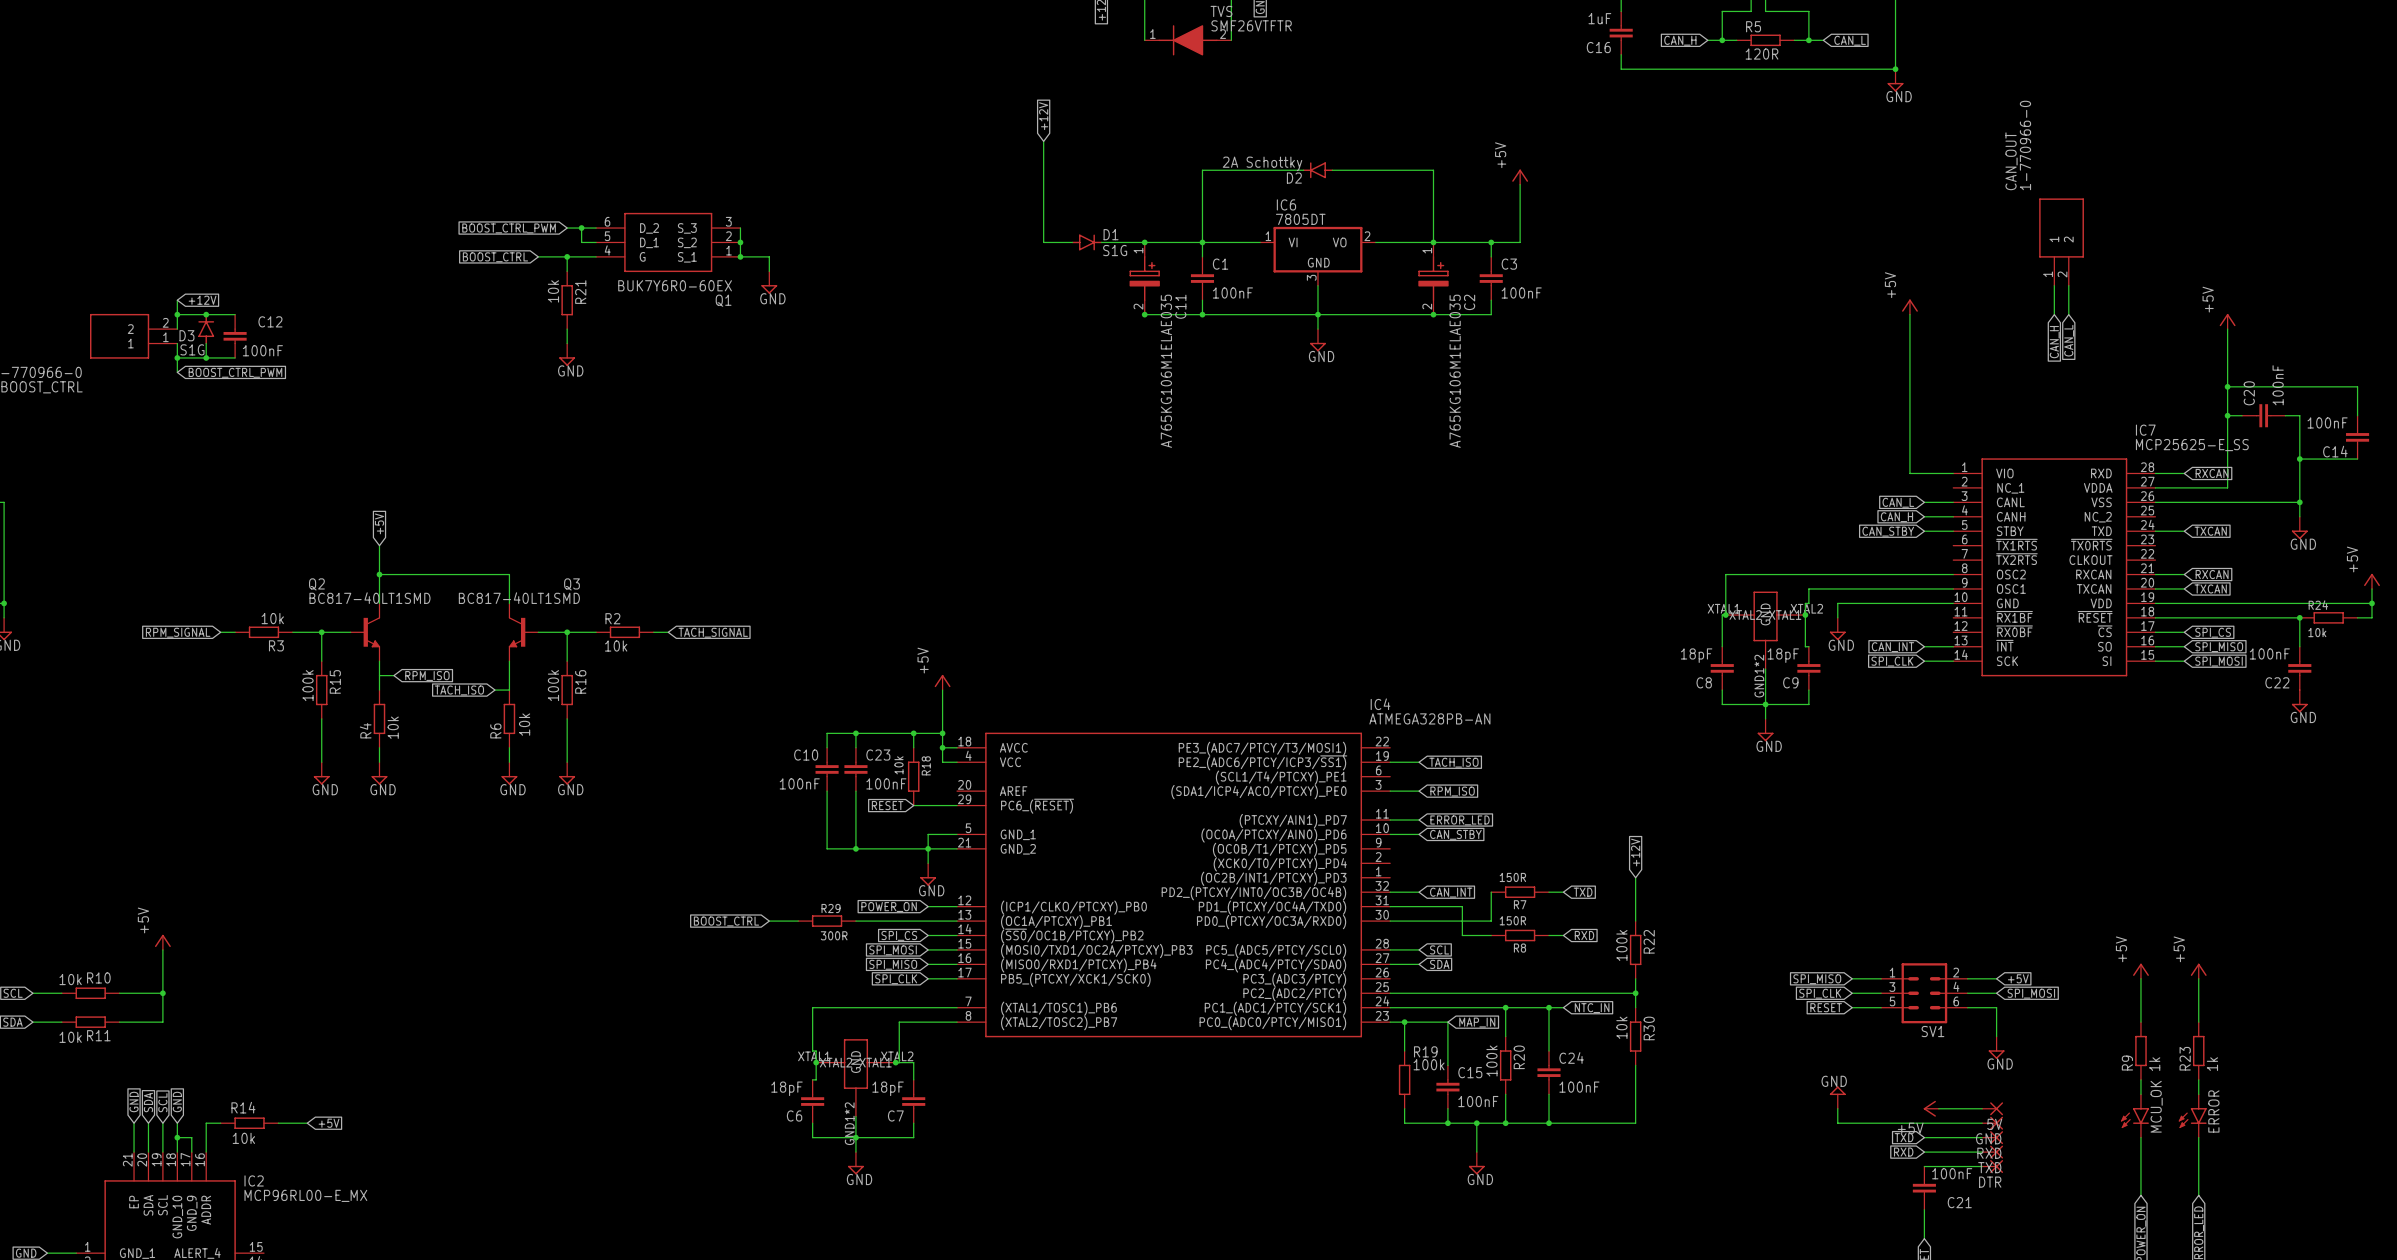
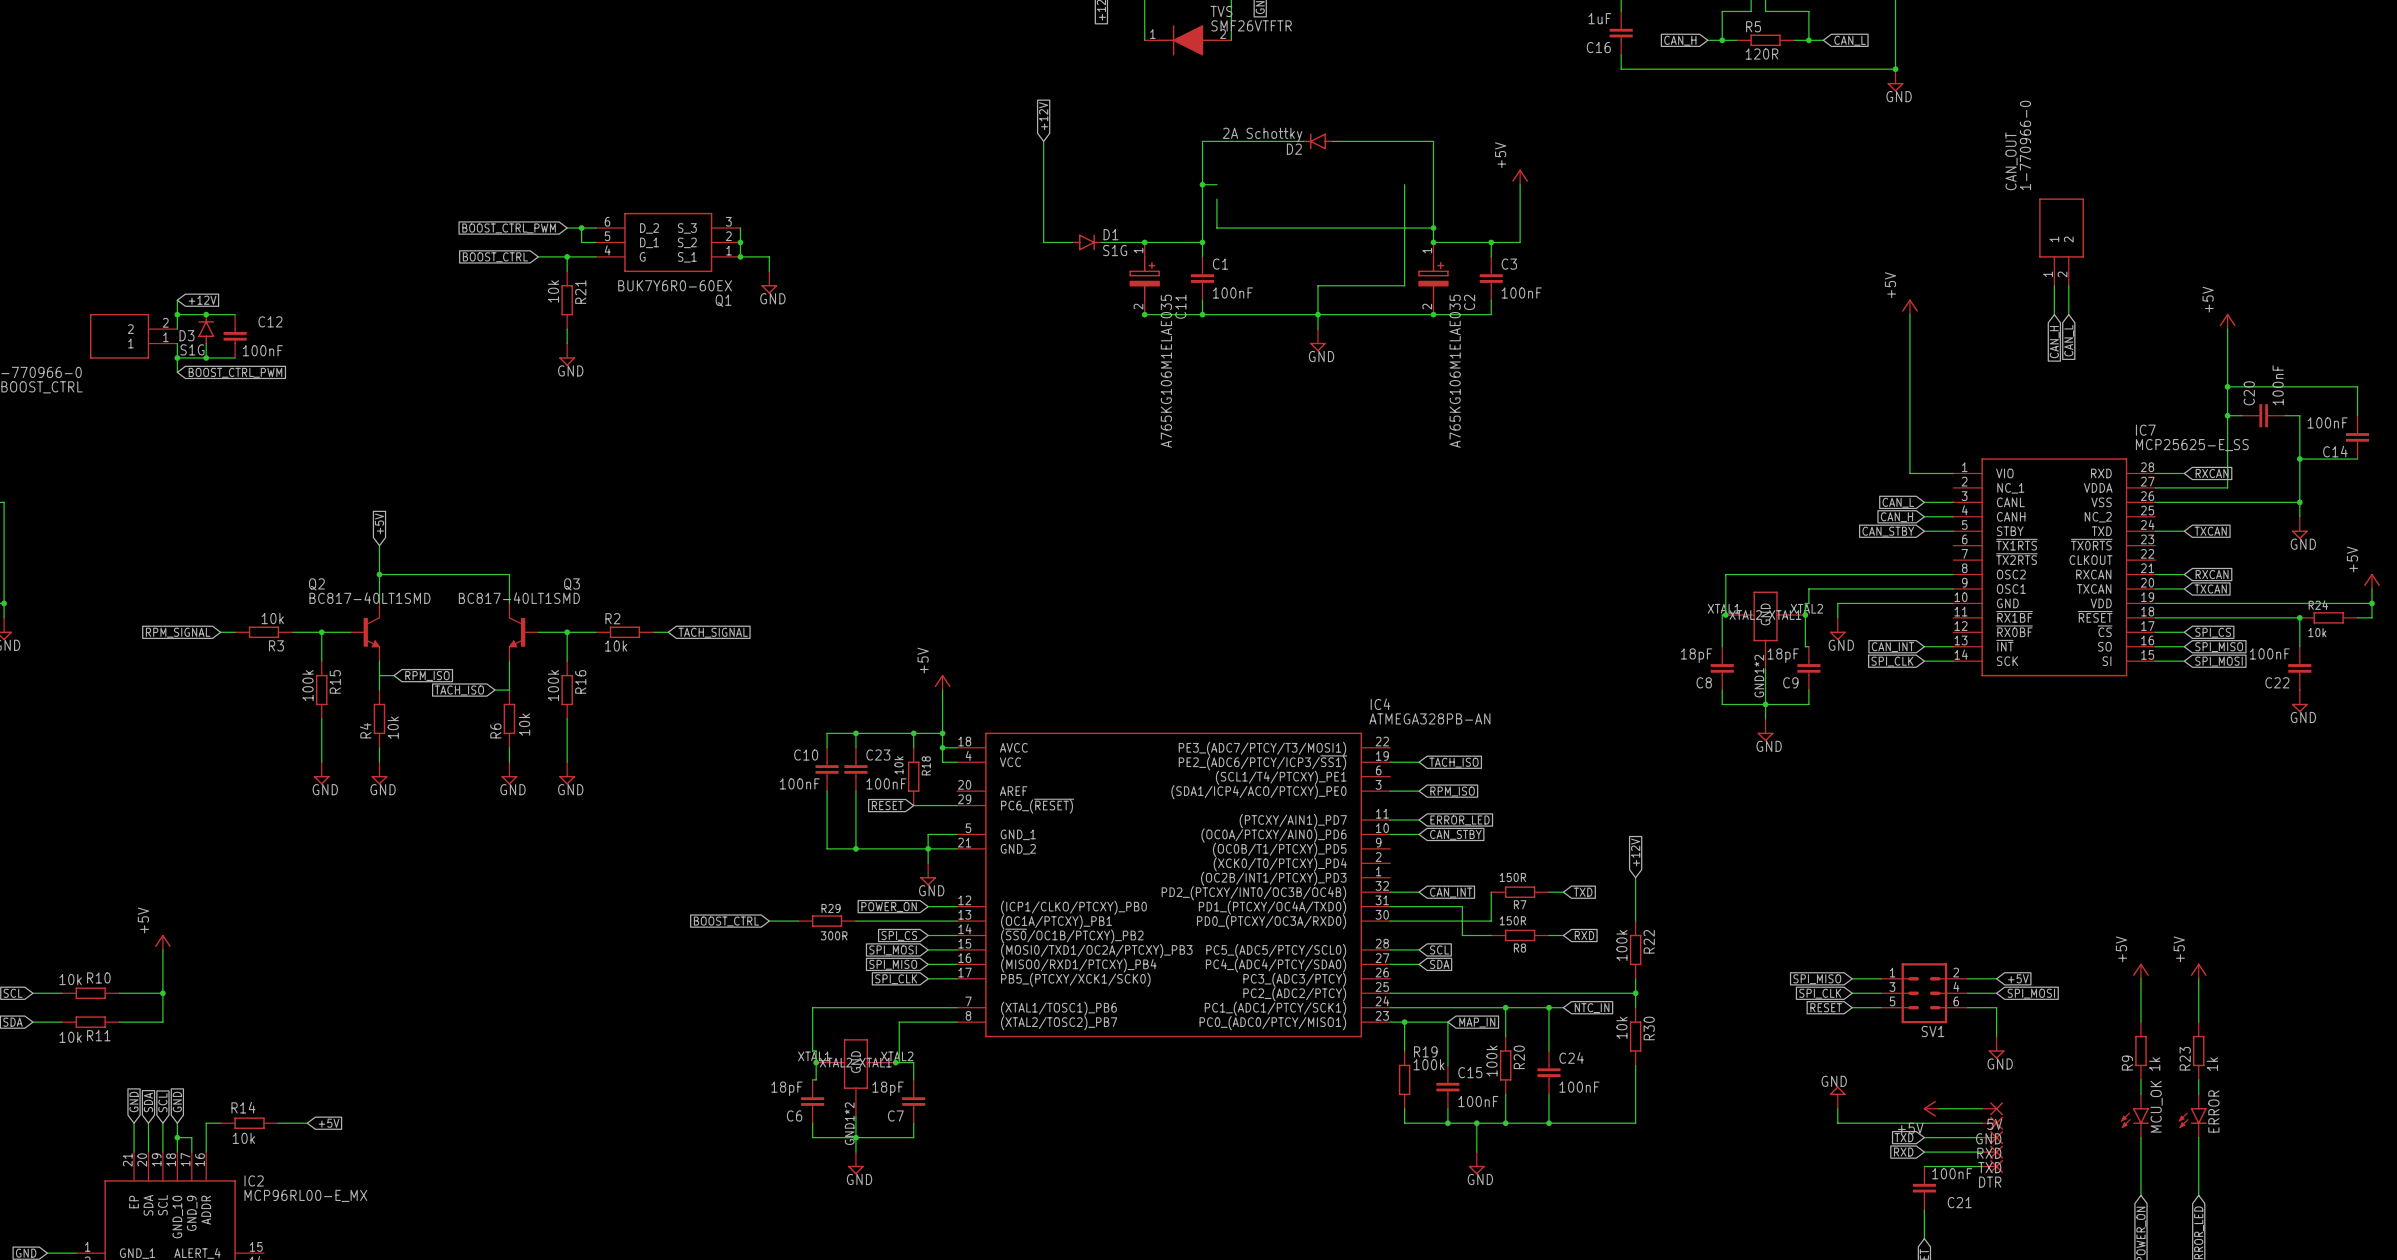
wire: (1202, 170) (1303, 170) -> (1202, 170) (1202, 141) (1303, 141)
D2 position: (1317, 170) -> (1317, 141)
wire: (1332, 170) (1433, 170) -> (1332, 141) (1433, 141) (1433, 170)
wire: none -> (1202, 184) (1216, 184)
junction: none -> (1202, 184)
wire: none -> (1404, 184) (1404, 285) (1317, 285)
wire: none -> (1216, 199) (1216, 228) (1433, 228)
junction: none -> (1433, 228)
wire: (1202, 242) (1260, 242) -> none
wire: (1375, 242) (1433, 242) -> none
IC6: 7805DT (1317, 256) -> none

